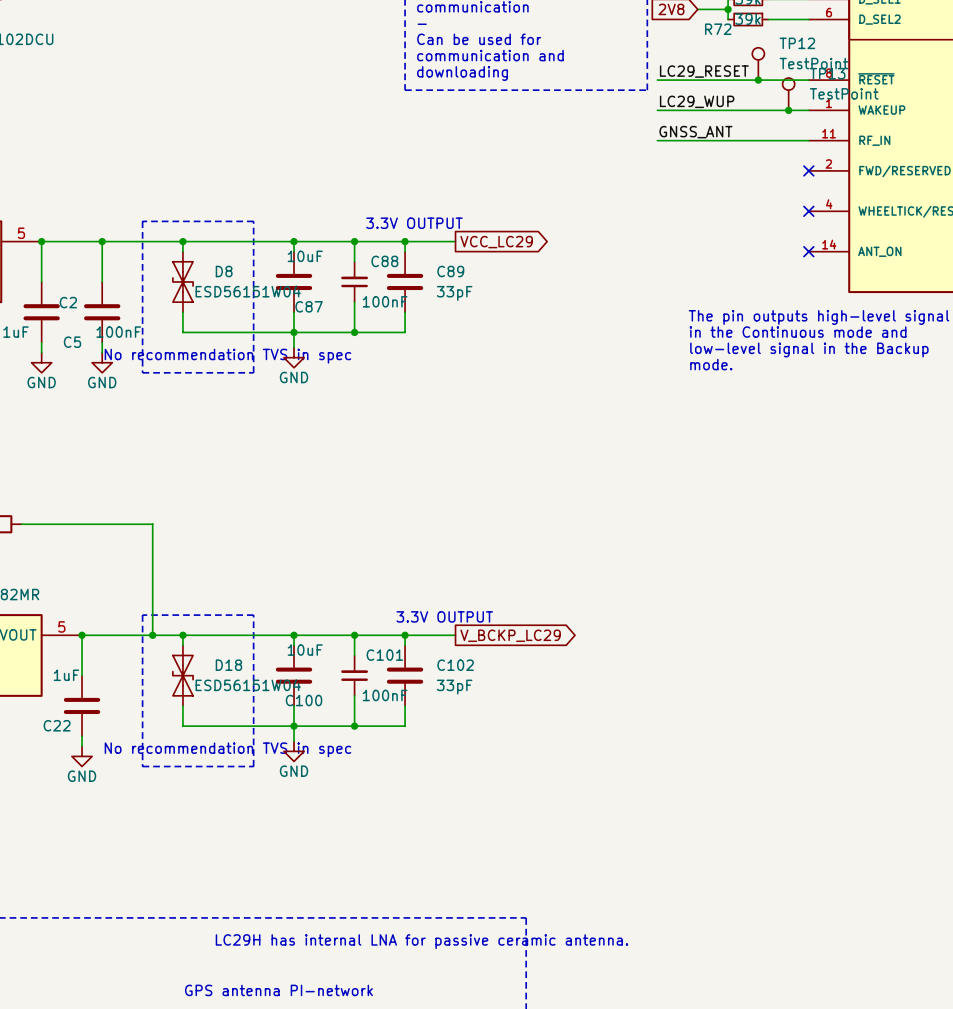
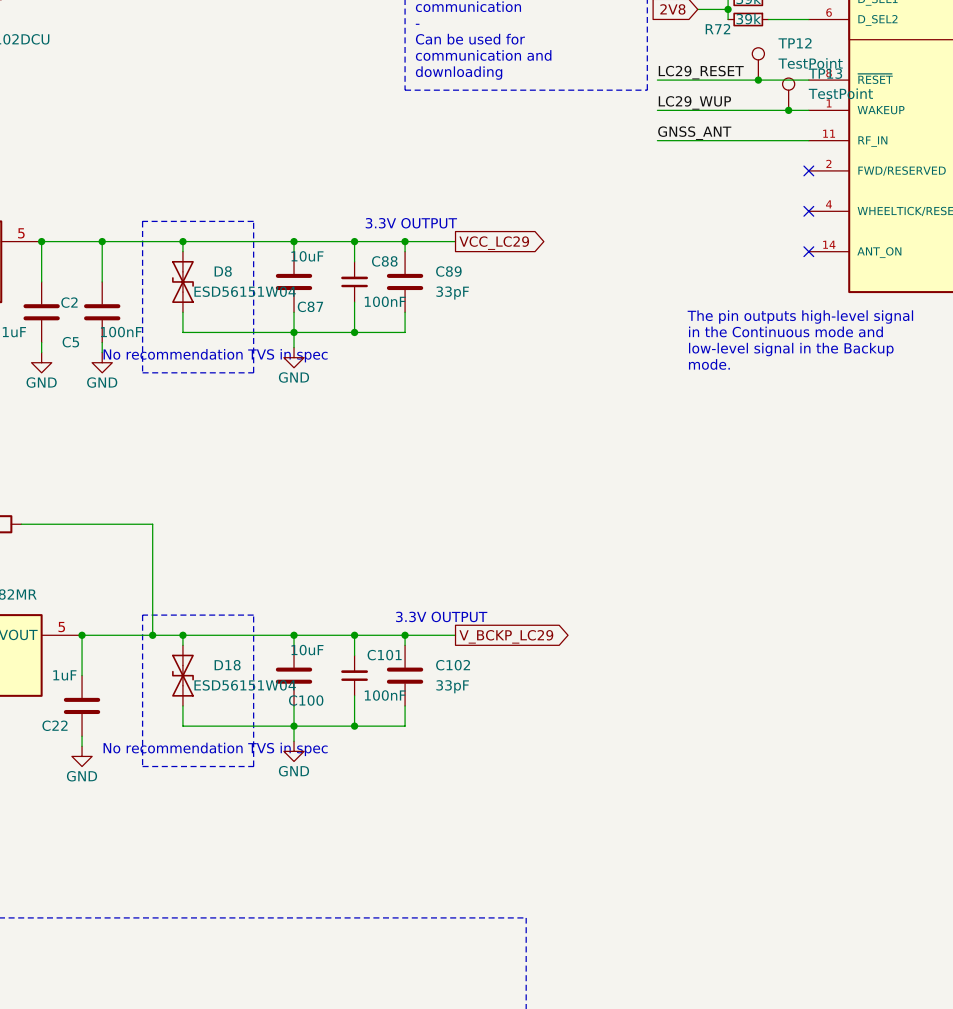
text: LC29H has internal LNA for passive ceramic antenna. (421, 941) -> none
text: GPS antenna PI-network (278, 990) -> none

